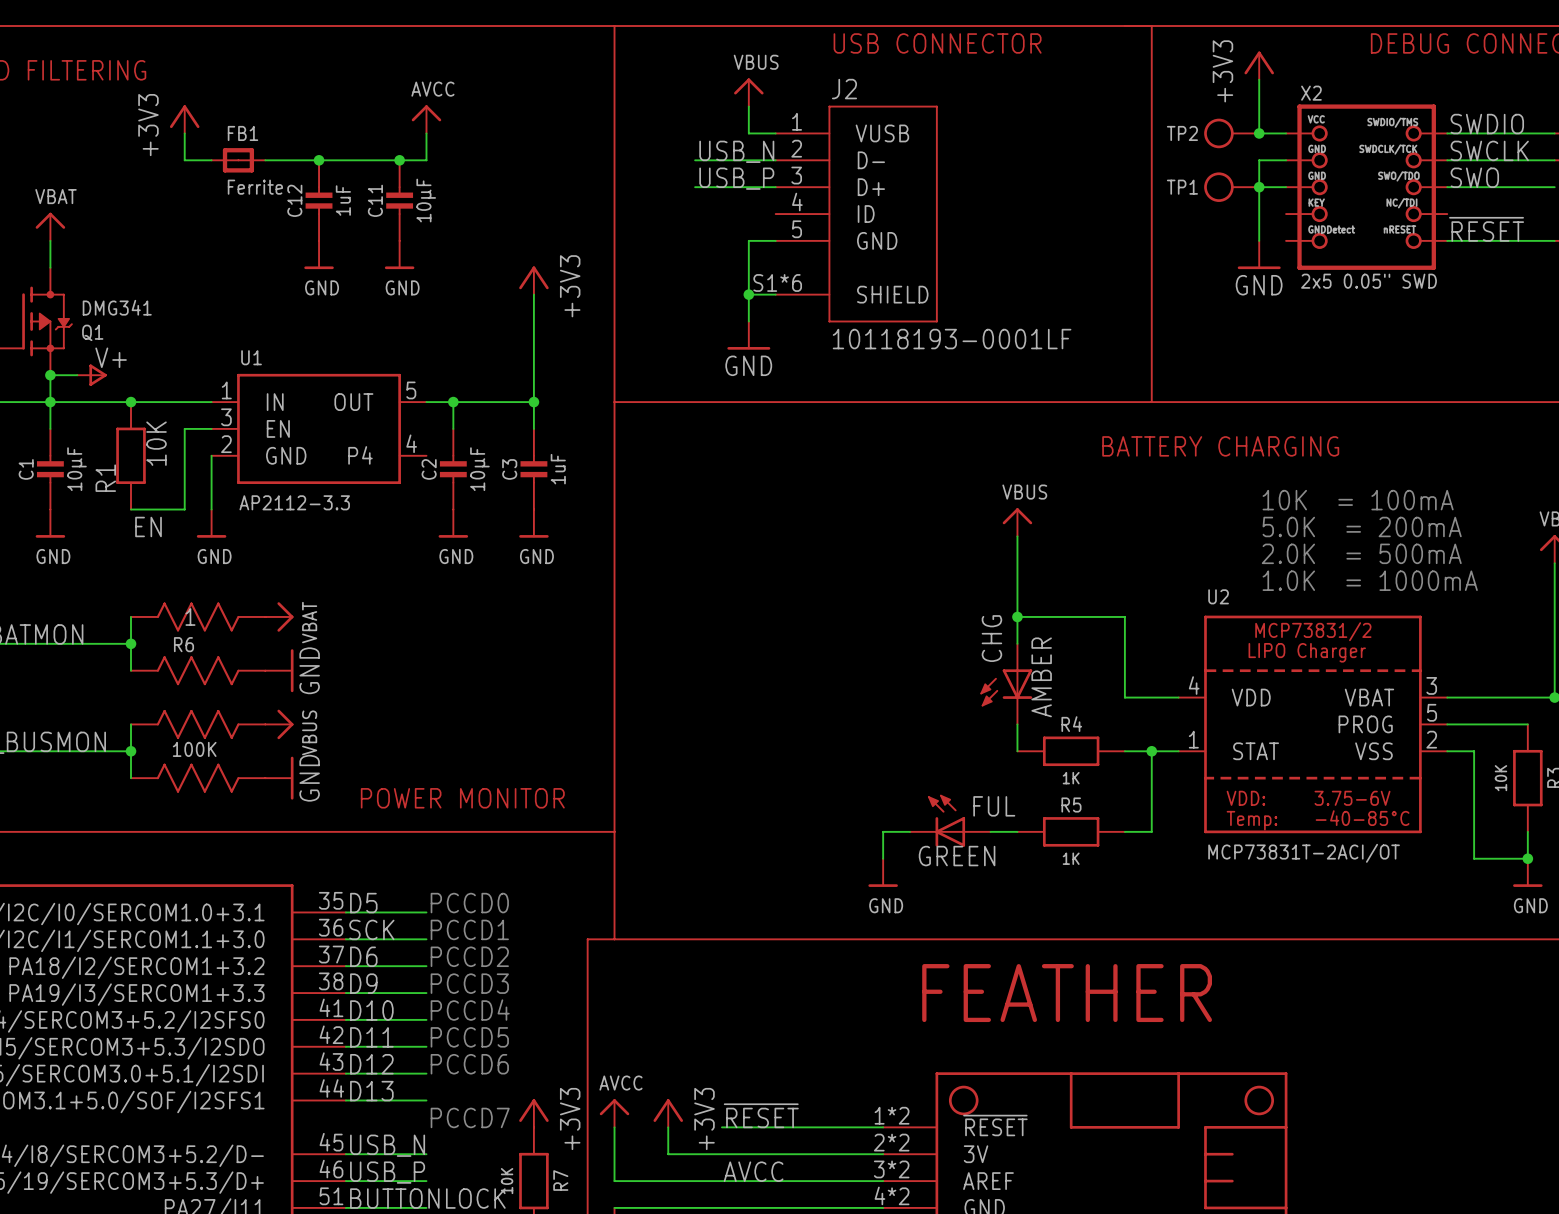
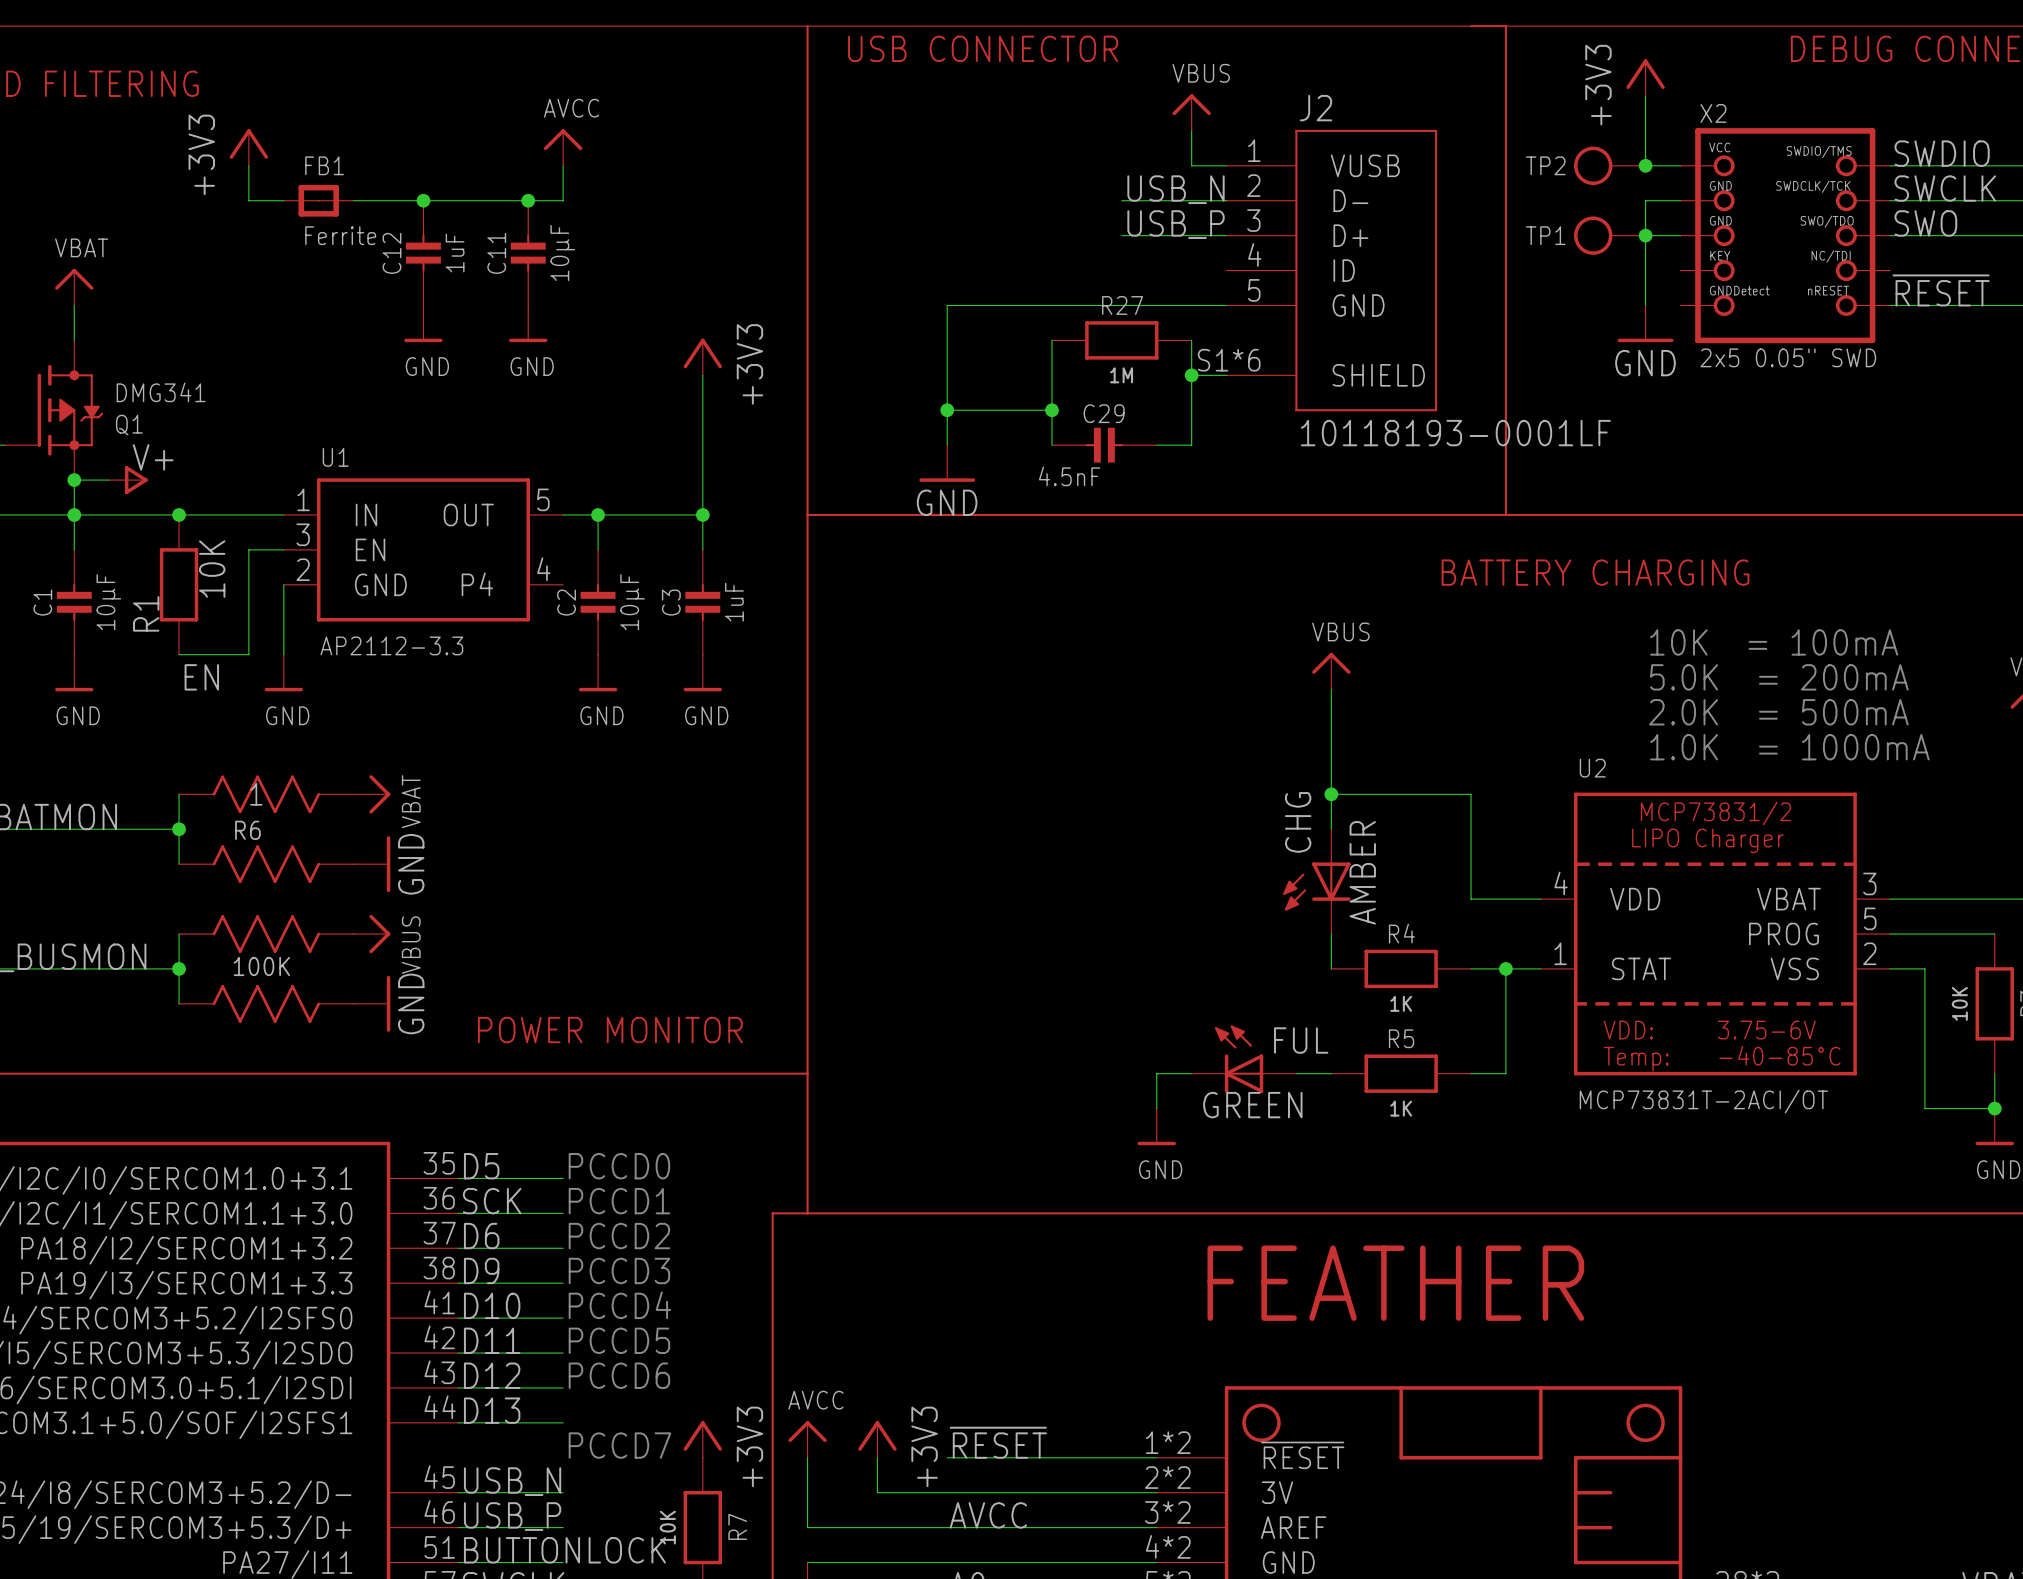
text position: USB CONNECTOR (937, 43) -> USB CONNECTOR (983, 48)
power symbol position: VBUS (748, 92) -> VBUS (1191, 112)
wire: (748, 106) (748, 133) (775, 133) -> (1191, 130) (1191, 165) (1226, 165)
label position: USB_N (736, 151) -> USB_N (1176, 189)
wire: (695, 160) (775, 160) -> (1121, 200) (1226, 200)
label position: USB_P (736, 178) -> USB_P (1176, 224)
wire: (695, 187) (775, 187) -> (1121, 235) (1226, 235)
J2 position: (856, 214) -> (1331, 270)
wire: (748, 240) (748, 321) -> (982, 305) (947, 305) (947, 445)
wire: none -> (1017, 305) (1226, 305)
wire: none -> (1051, 340) (1051, 445)
R27: none -> 1M (1121, 340)
wire: none -> (1191, 340) (1191, 445) (1156, 445)
wire: (748, 294) (775, 294) -> (1191, 375) (1226, 375)
junction: (748, 294) -> none
junction: none -> (1191, 375)
wire: none -> (947, 410) (1051, 410)
junction: none -> (947, 410)
junction: none -> (1051, 410)
power symbol position: GND (748, 335) -> GND (947, 463)
C29: none -> 4.5nF (1104, 445)

